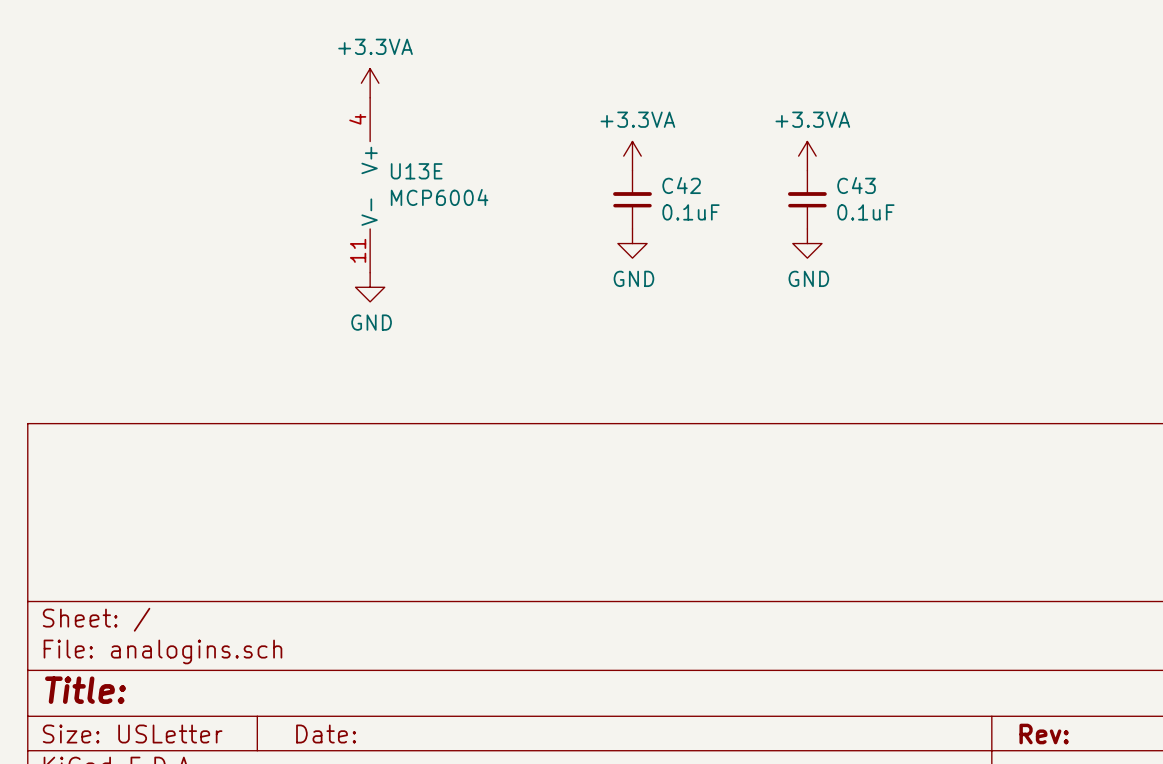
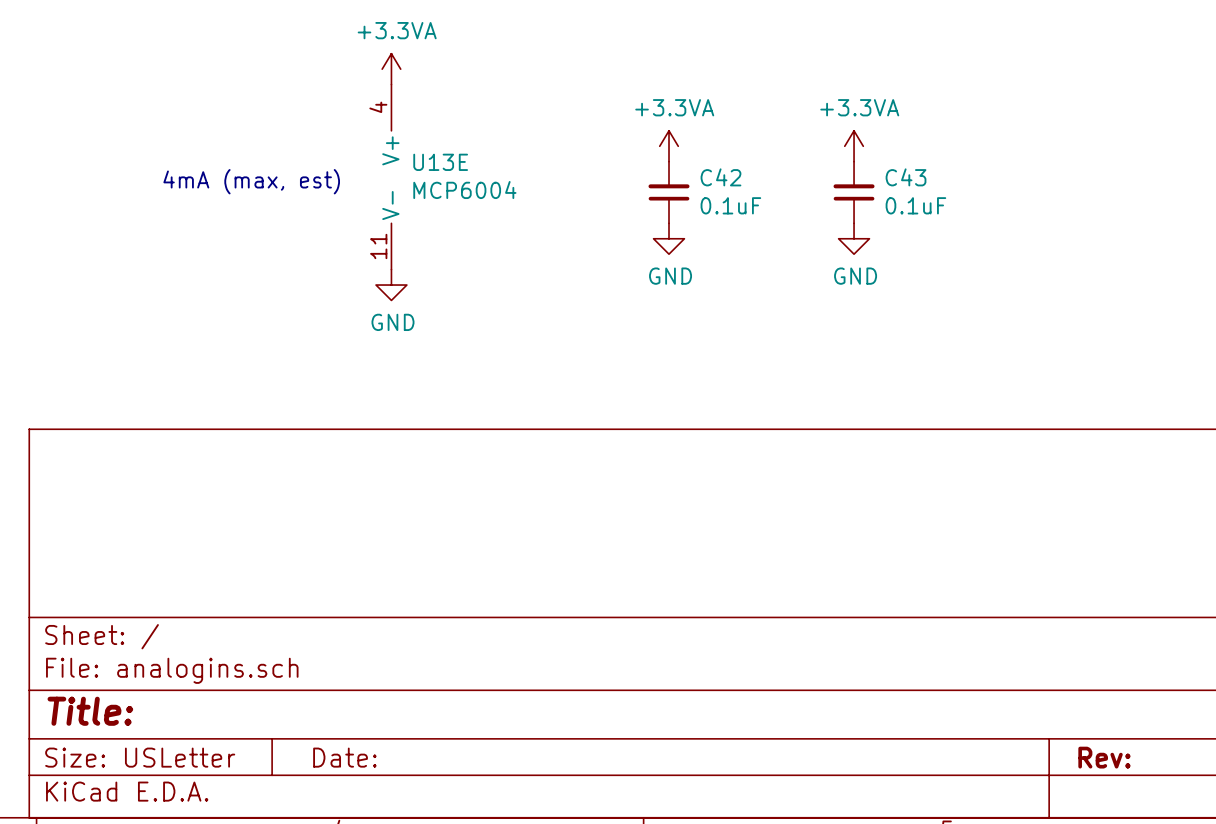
text: none -> 4mA (max, est) (251, 181)

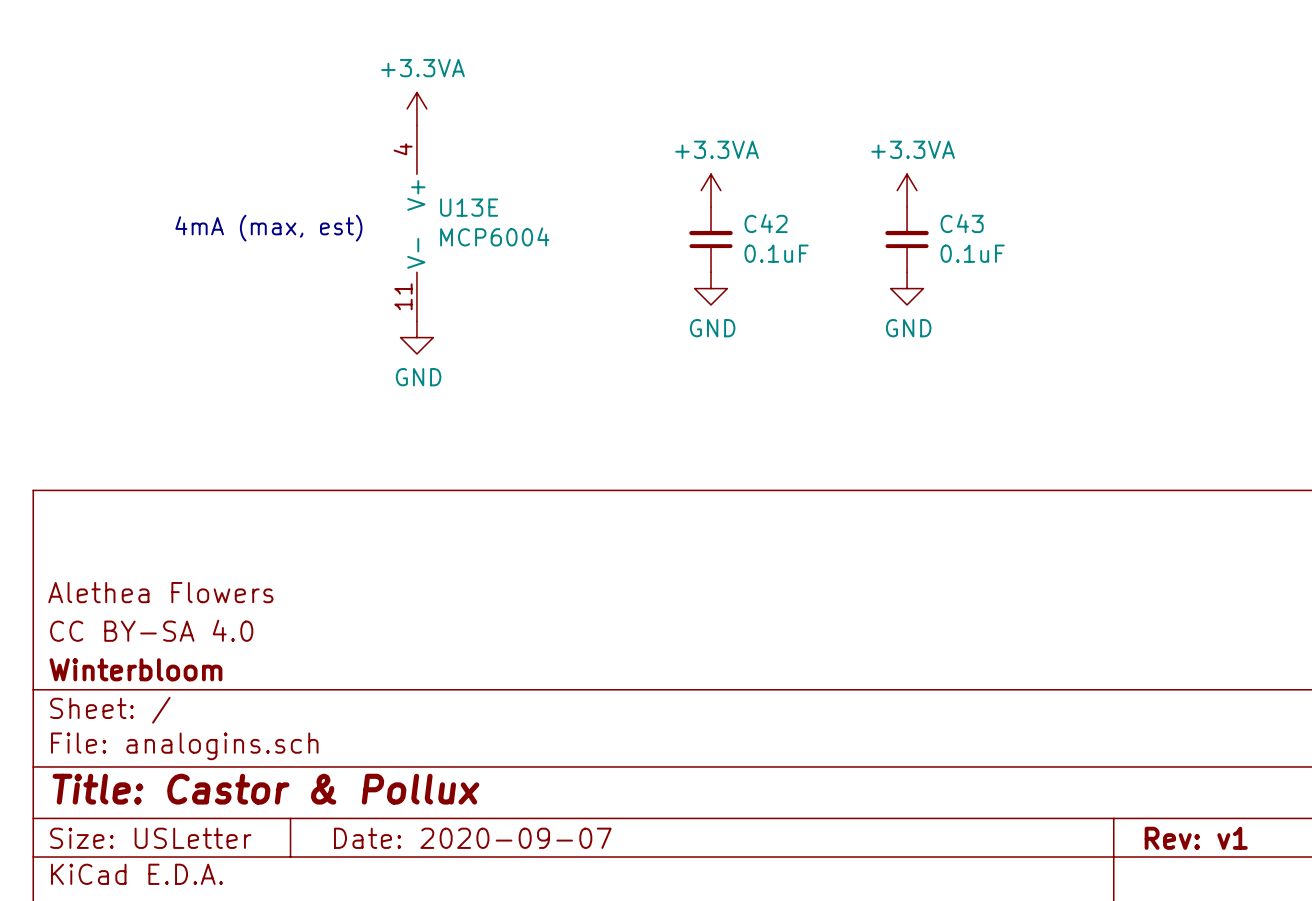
title block: none -> Alethea Flowers (160, 592)
title block: none -> CC BY-SA 4.0 (151, 630)
title block: none -> Winterbloom (135, 669)
title block: Title: (90, 711) -> Title: Castor & Pollux (265, 789)
title block: Date: (344, 757) -> Date: 2020-09-07 (472, 838)
title block: Rev: (1104, 757) -> Rev: v1 (1196, 838)

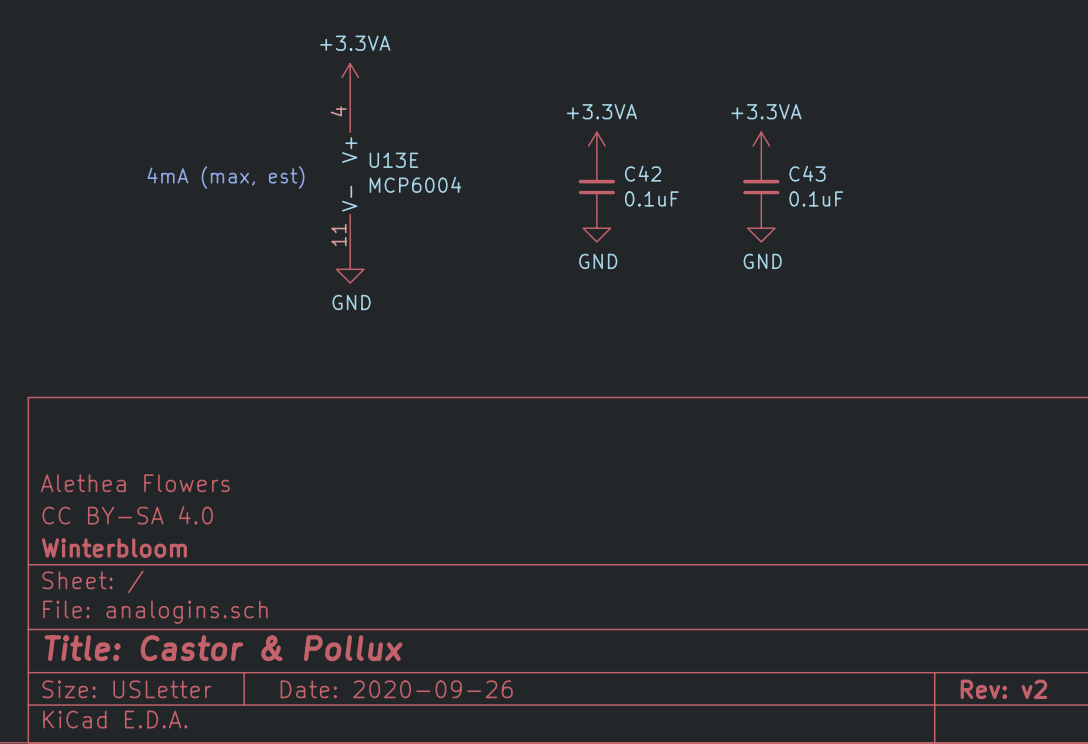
title block: Date: 2020-09-07 (472, 838) -> Date: 2020-09-26 (396, 689)
title block: Rev: v1 (1196, 838) -> Rev: v2 (1003, 689)

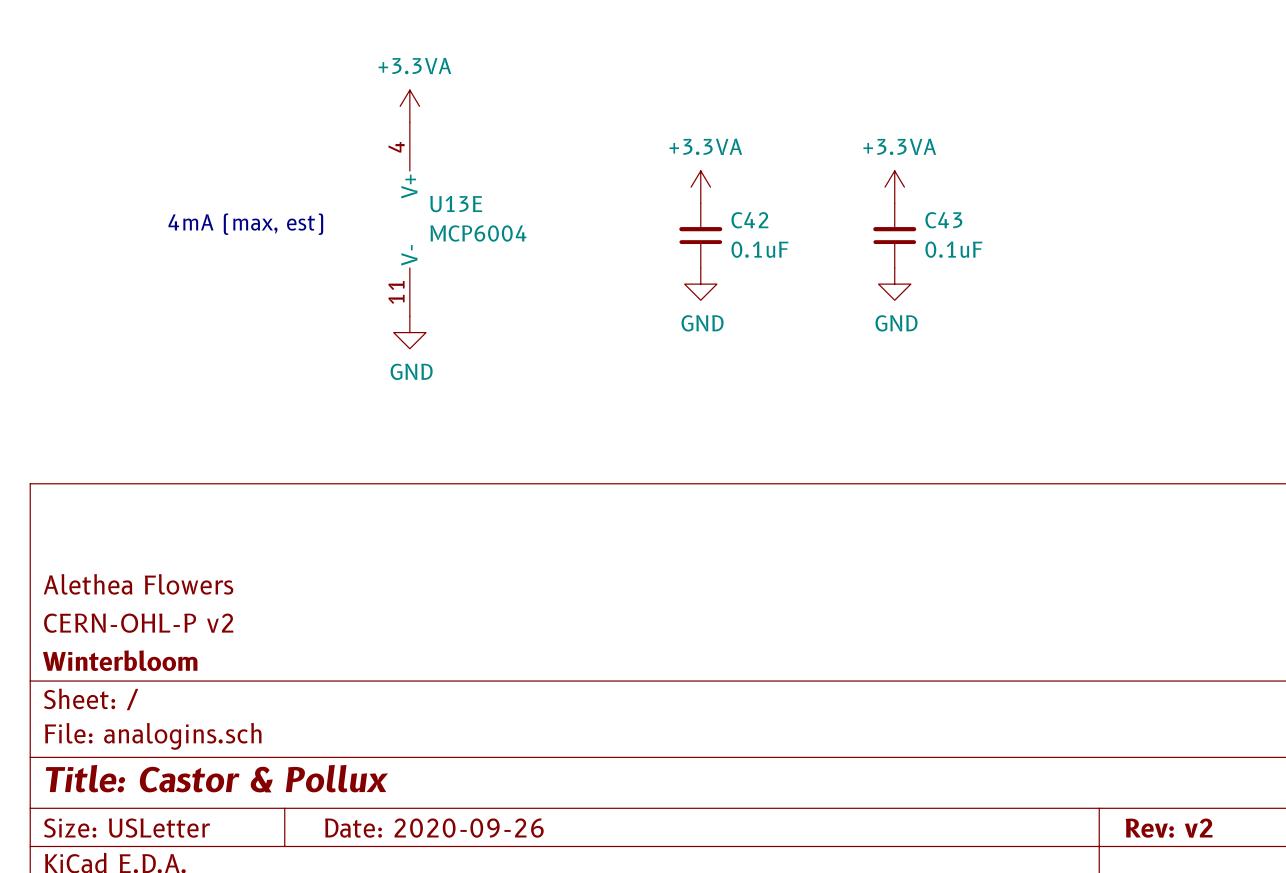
title block: CC BY-SA 4.0 (127, 515) -> CERN-OHL-P v2 (138, 623)

